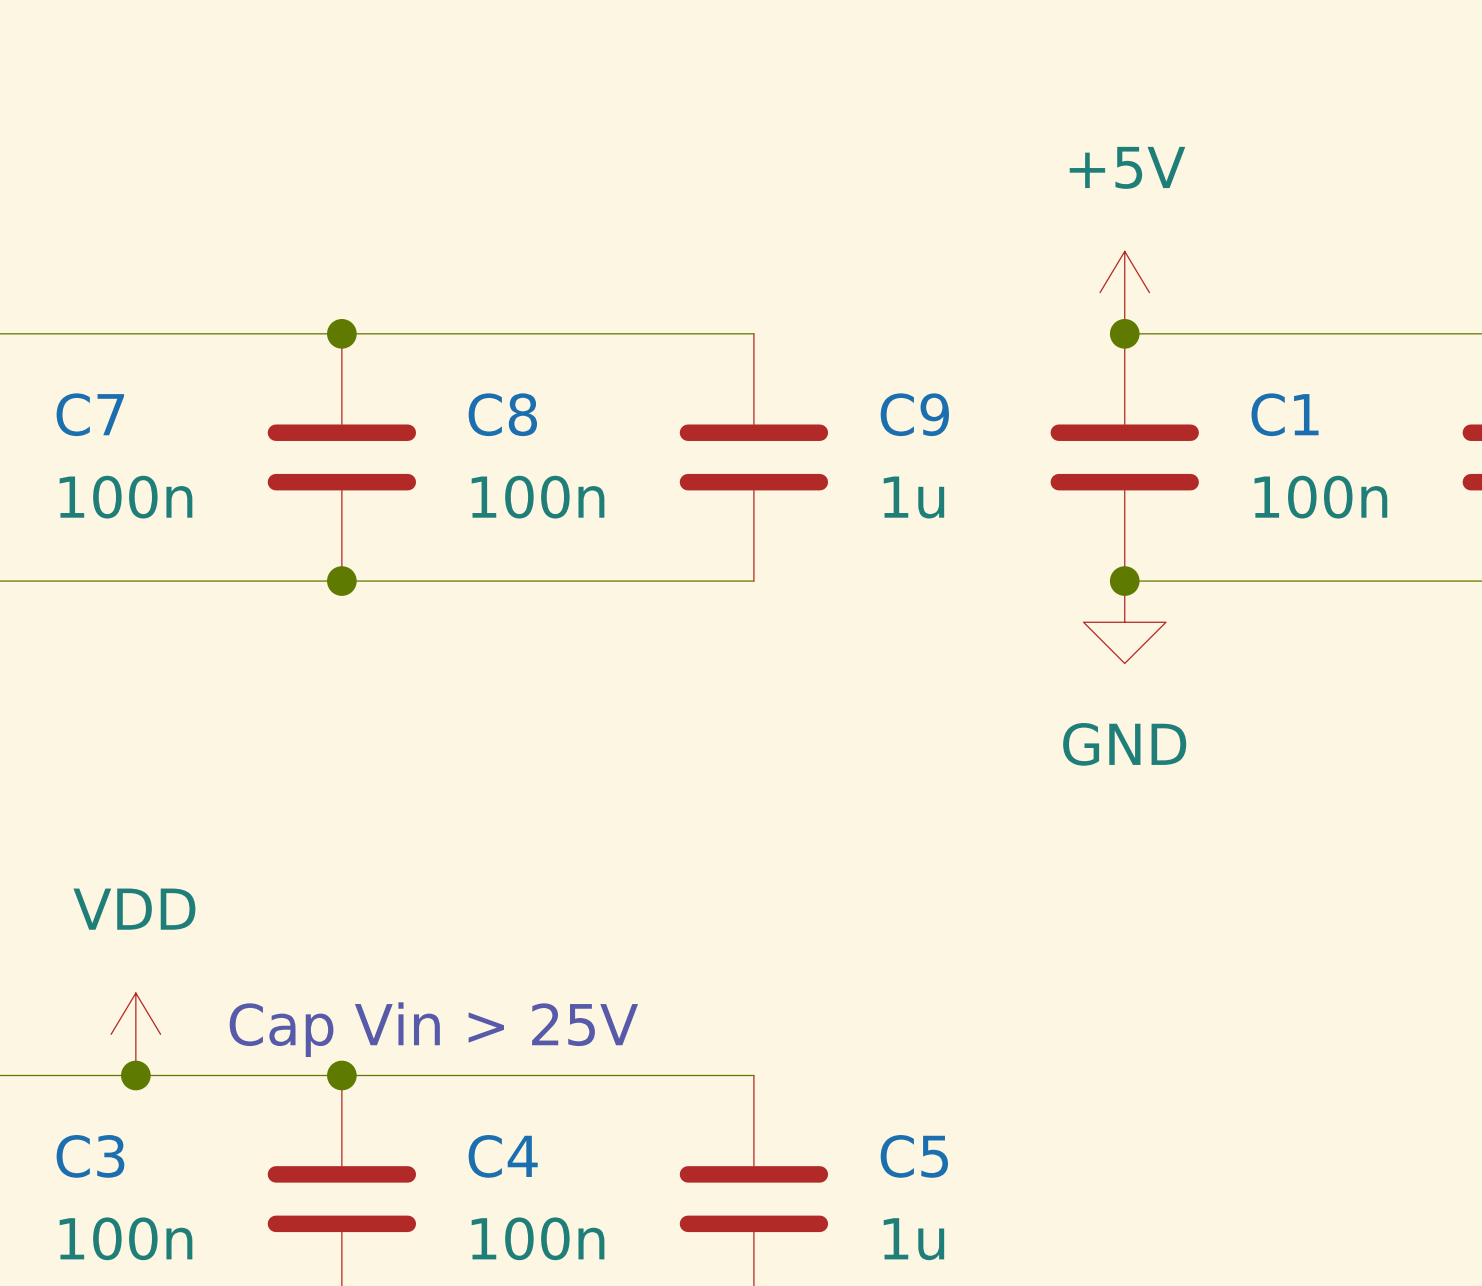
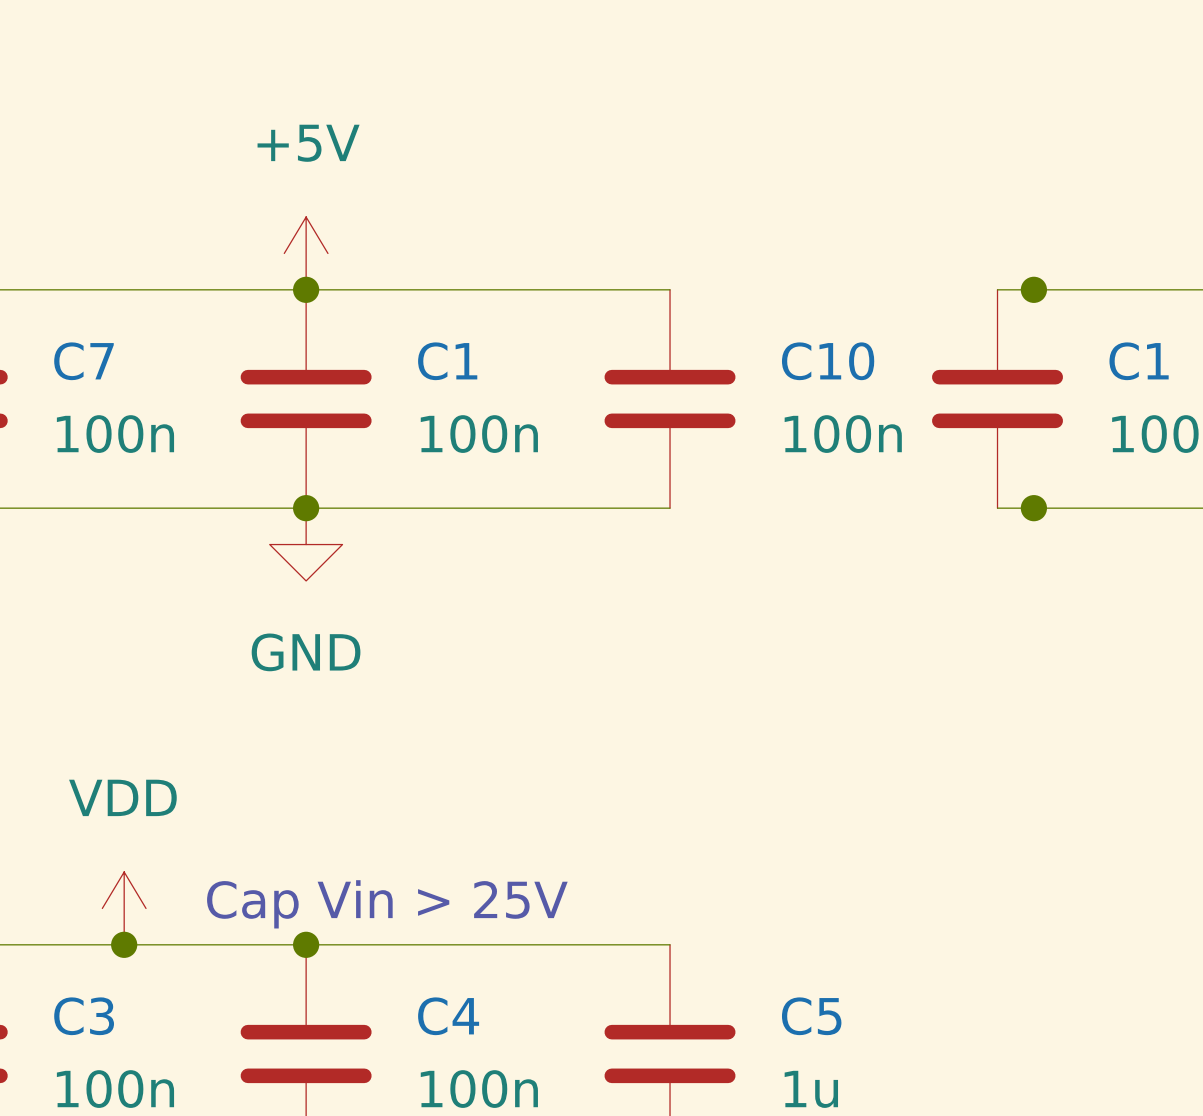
power symbol position: +5V (1124, 292) -> +5V (306, 253)
junction position: (1124, 333) -> (1033, 289)
C8 name: C8 (502, 414) -> C1 (447, 361)
C9 name: C9 (914, 414) -> C10 (828, 361)
C9 value: 1u (913, 497) -> 100n (843, 434)
junction position: (1124, 581) -> (1033, 508)
power symbol: none -> GND (306, 544)
power symbol: GND (1124, 622) -> none

